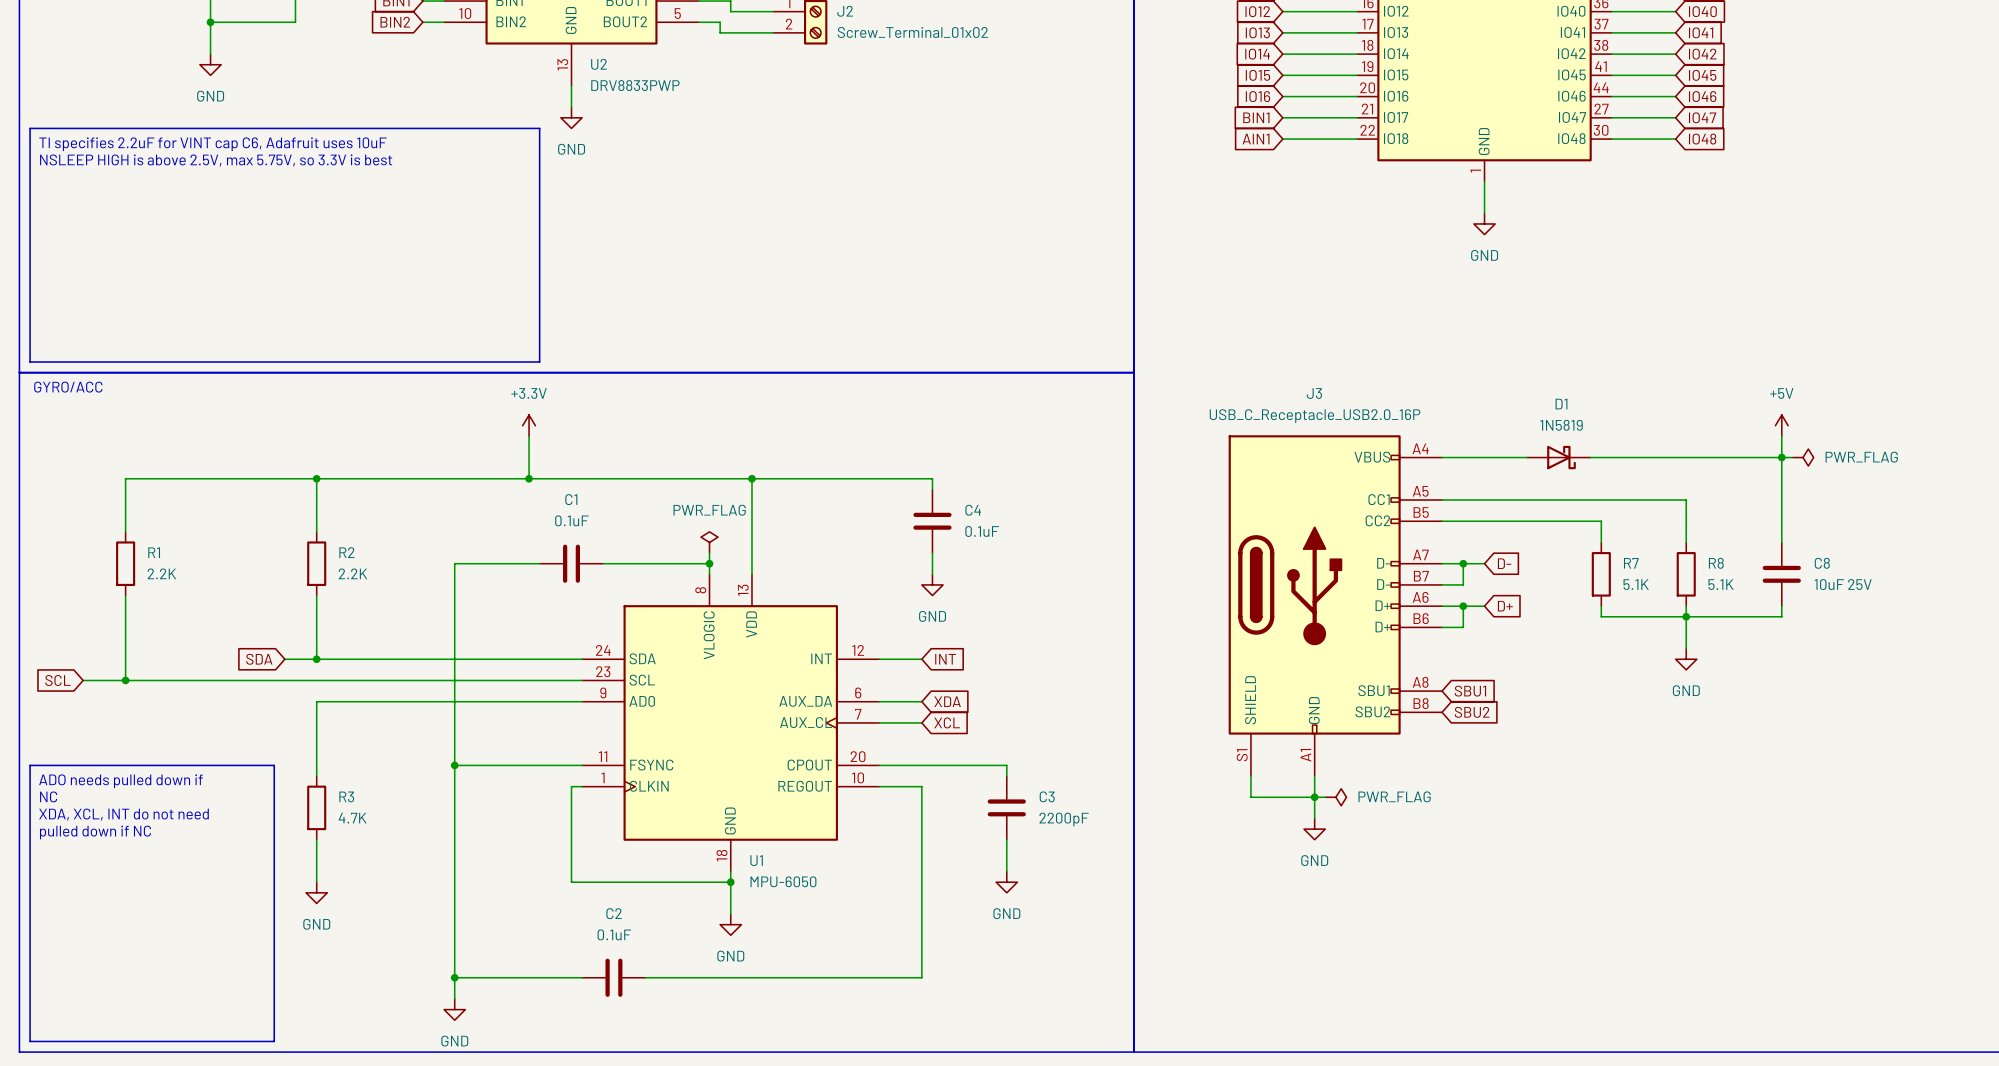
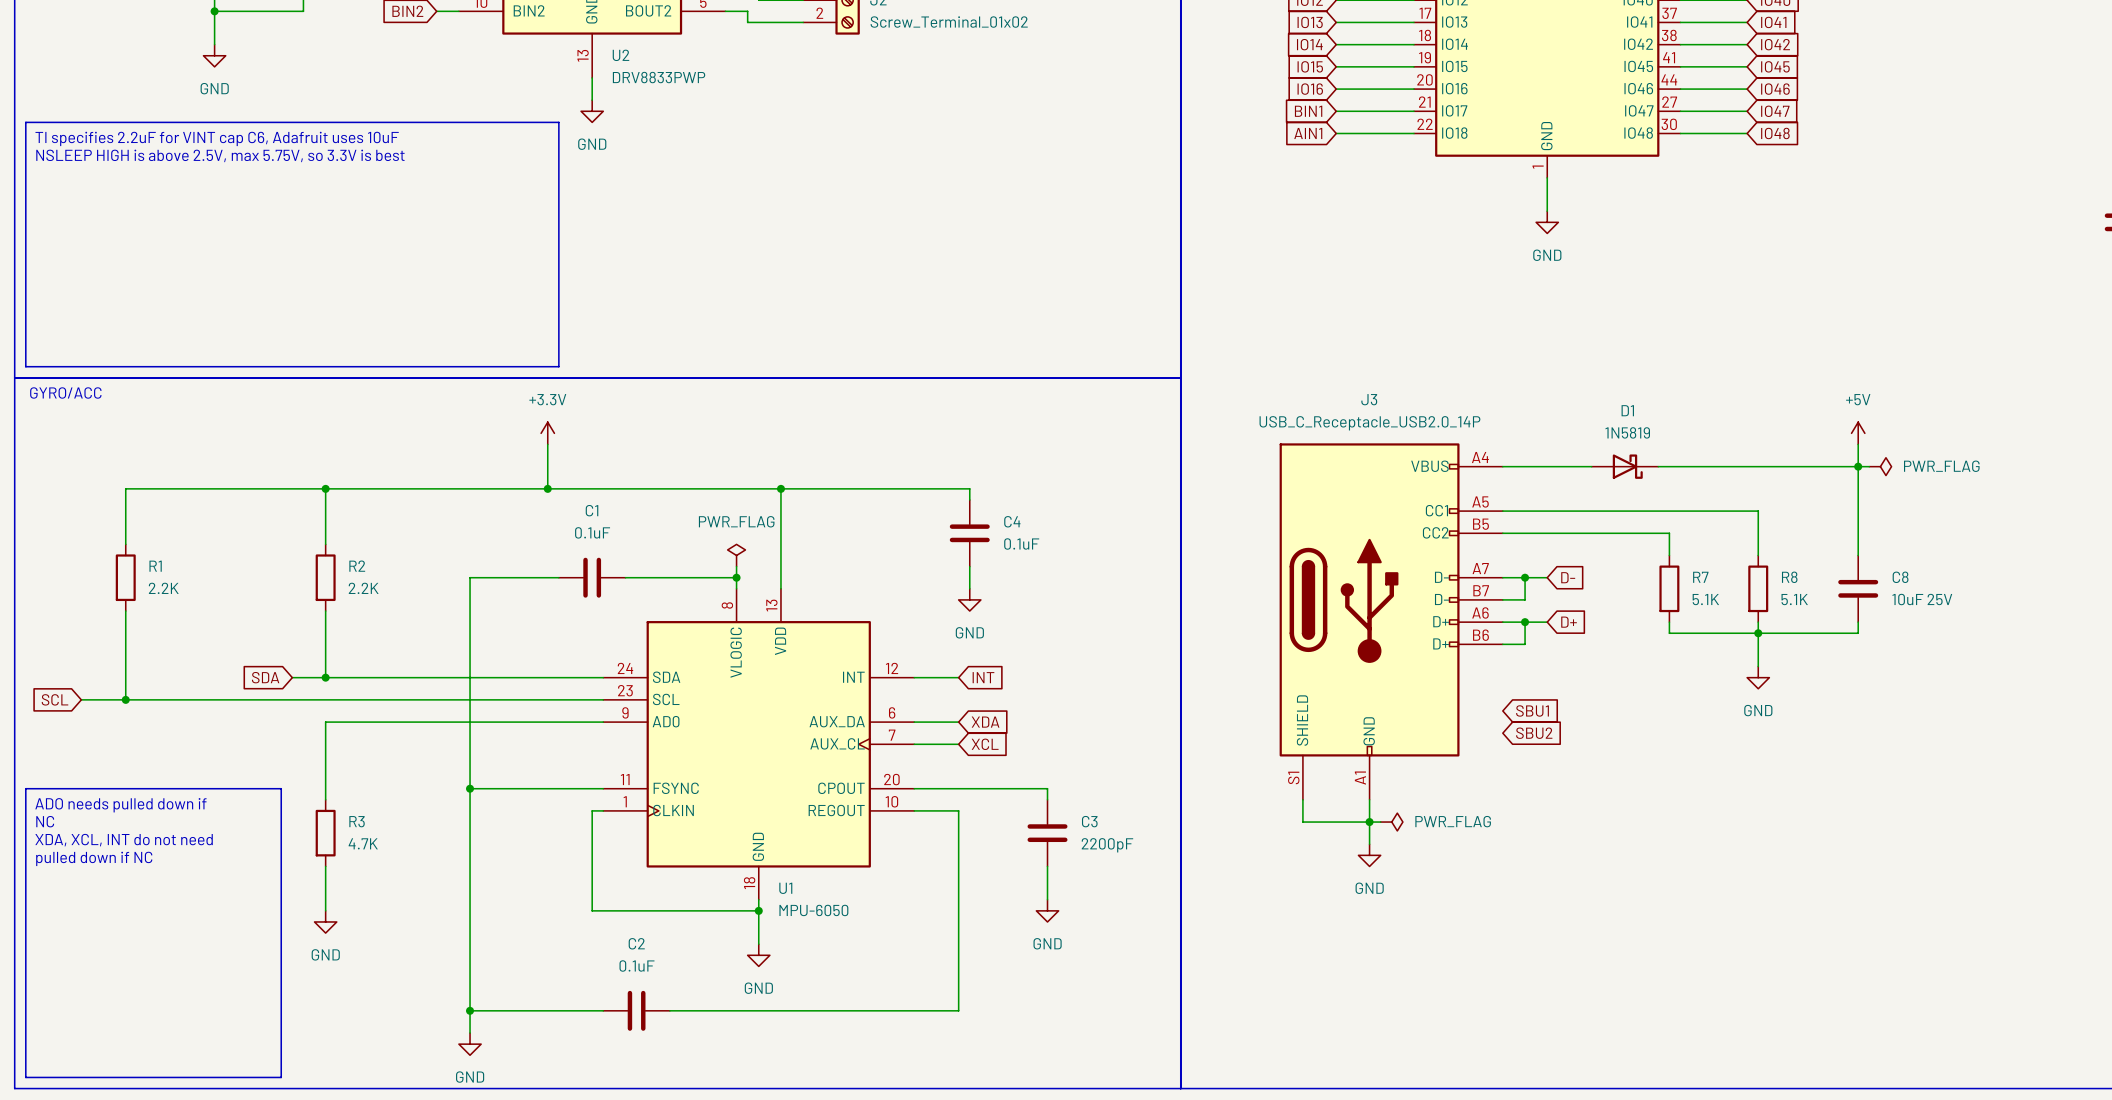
J3 value: USB_C_Receptacle_USB2.0_16P (1315, 416) -> USB_C_Receptacle_USB2.0_14P (1369, 423)
J3 symbol: [1228, 435, 1443, 777] -> [1279, 443, 1503, 800]

